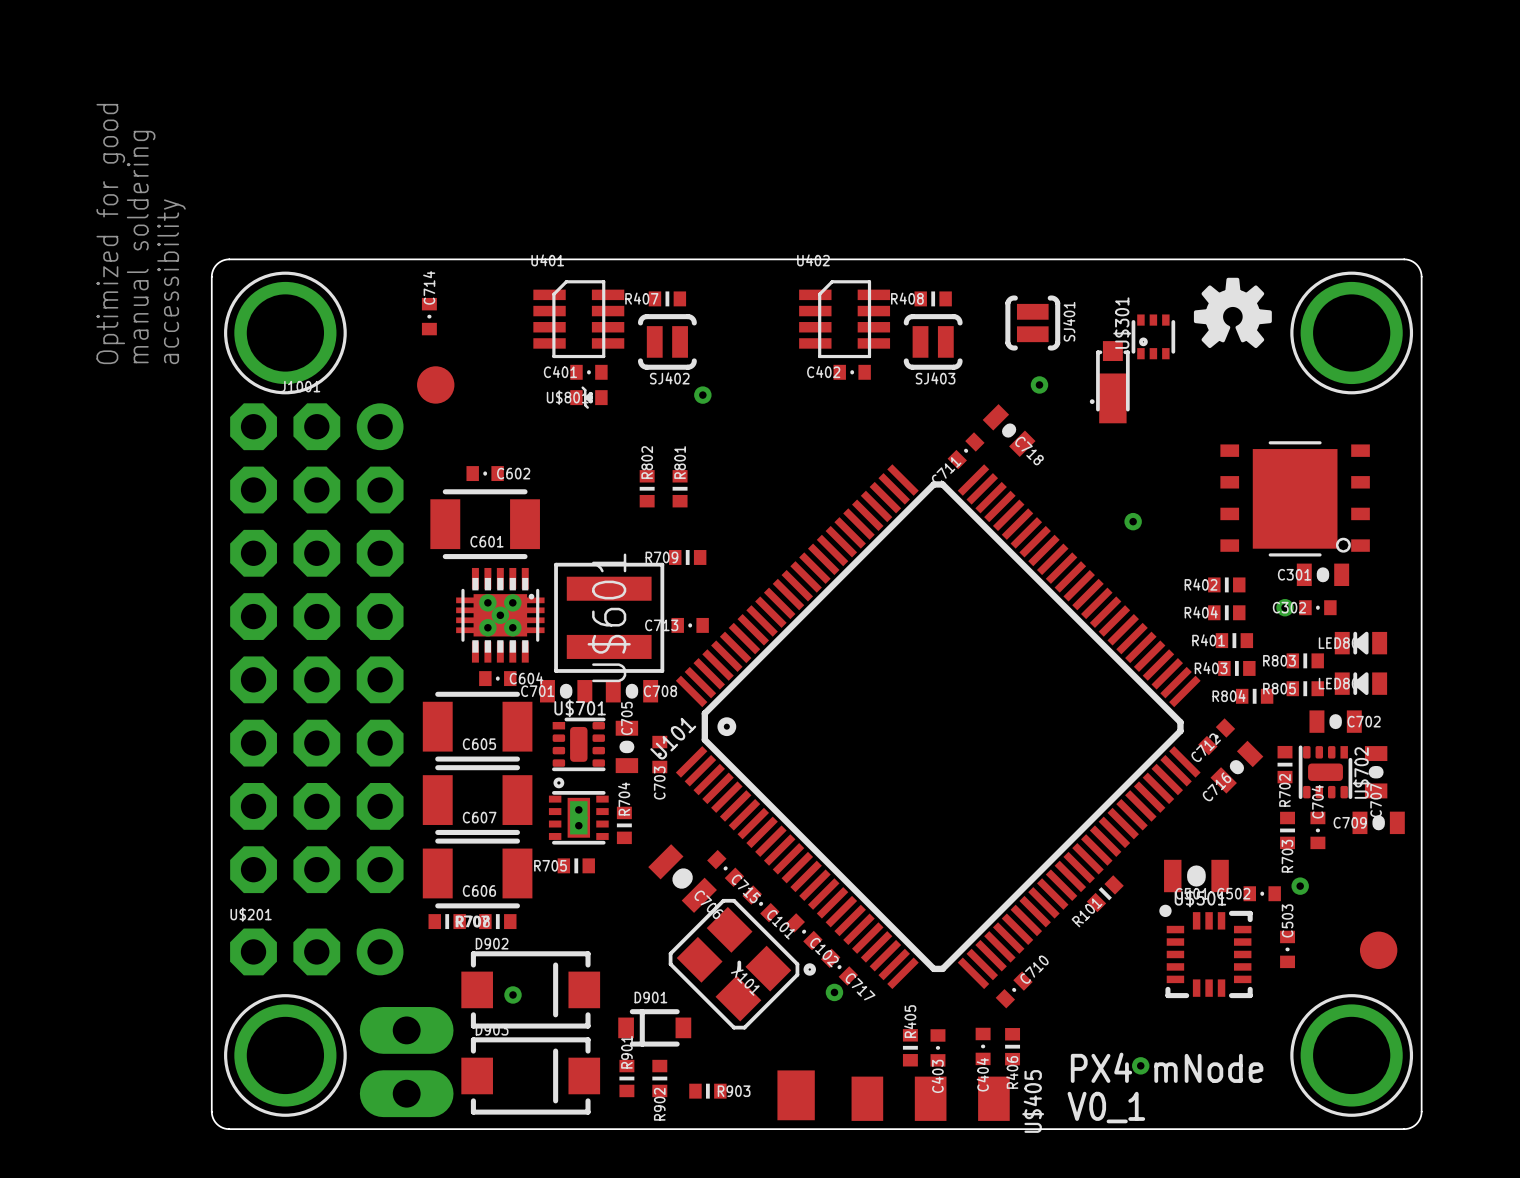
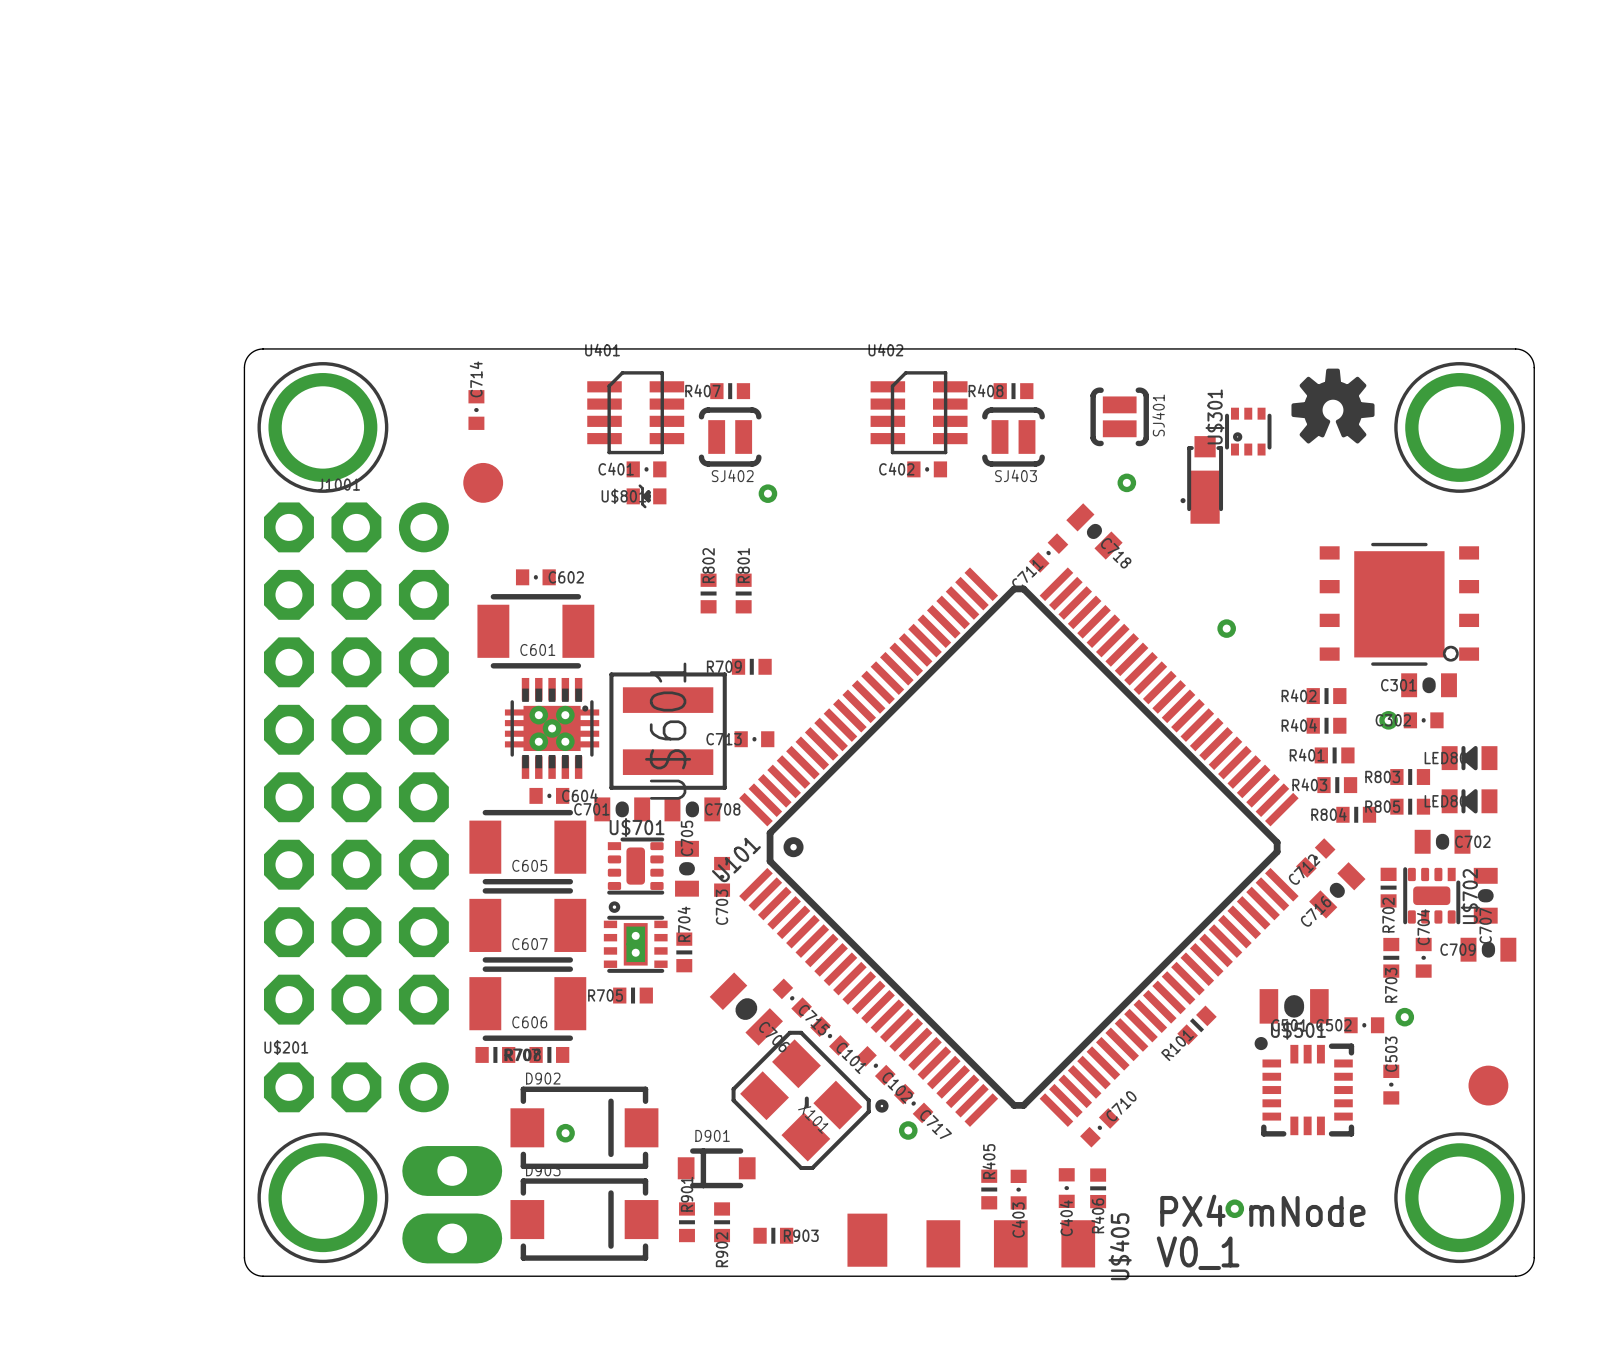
text: Optimized for good (110, 234) -> none
text: manual soldering (141, 247) -> none
text: accessibility (171, 281) -> none

